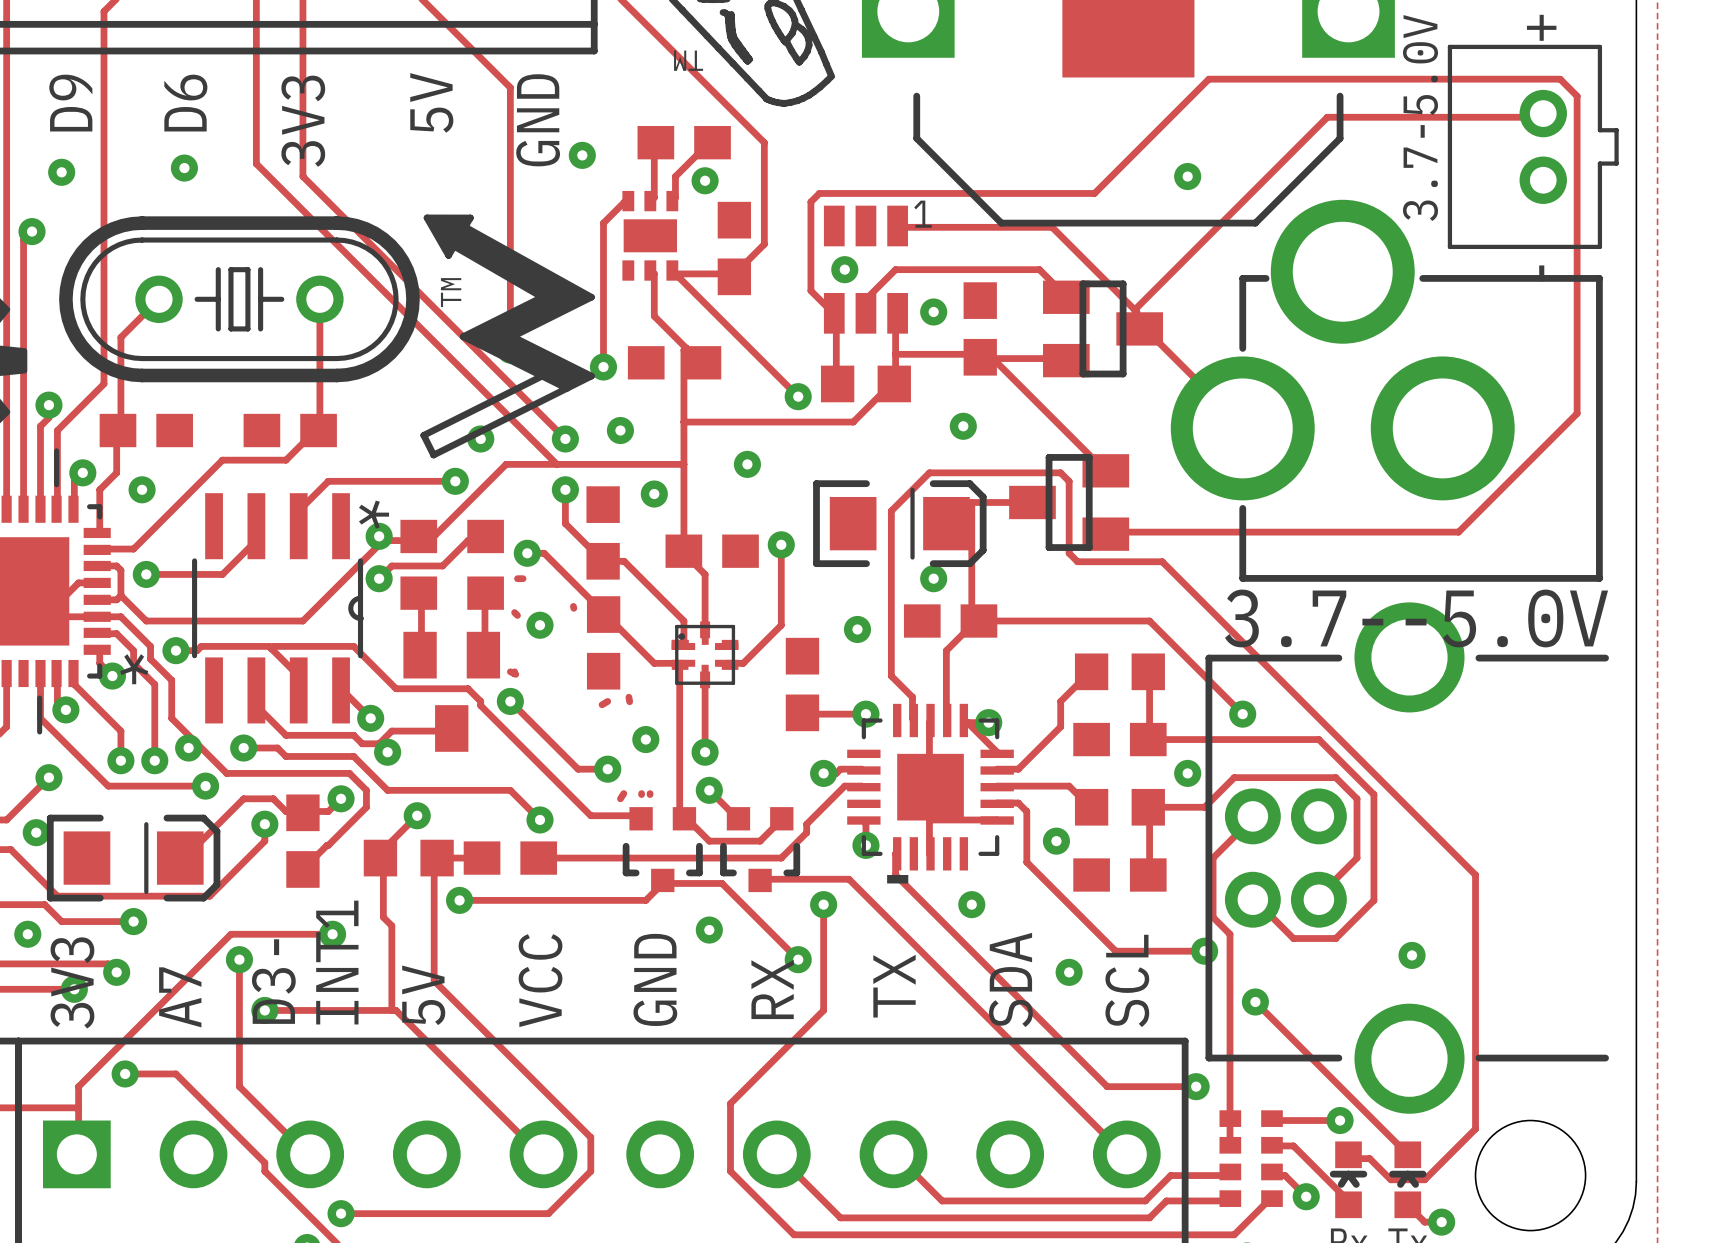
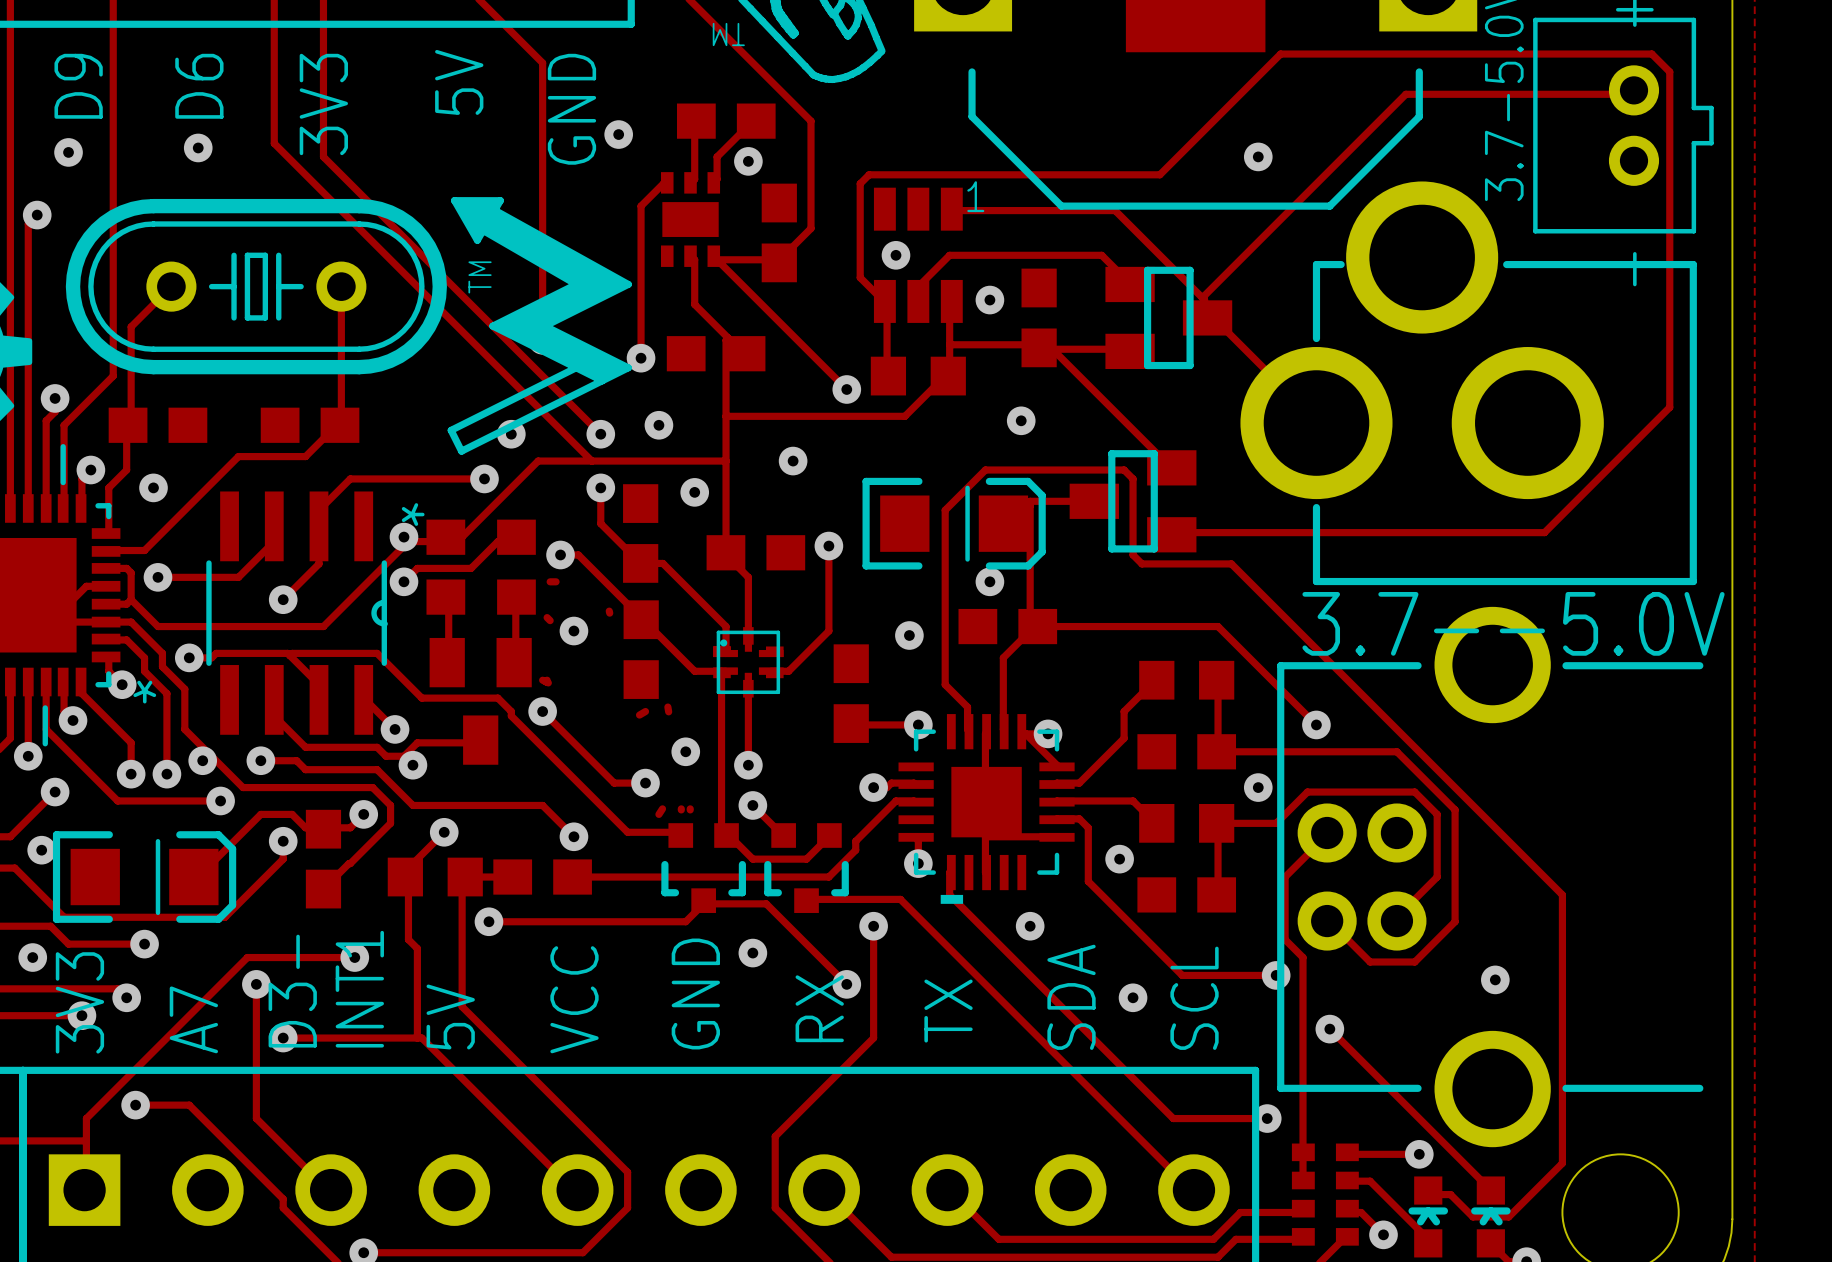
track: none -> (319, 526) (319, 563) (283, 599)
via: none -> (283, 599)
track: none -> (28, 682) (28, 756)
via: none -> (28, 756)

